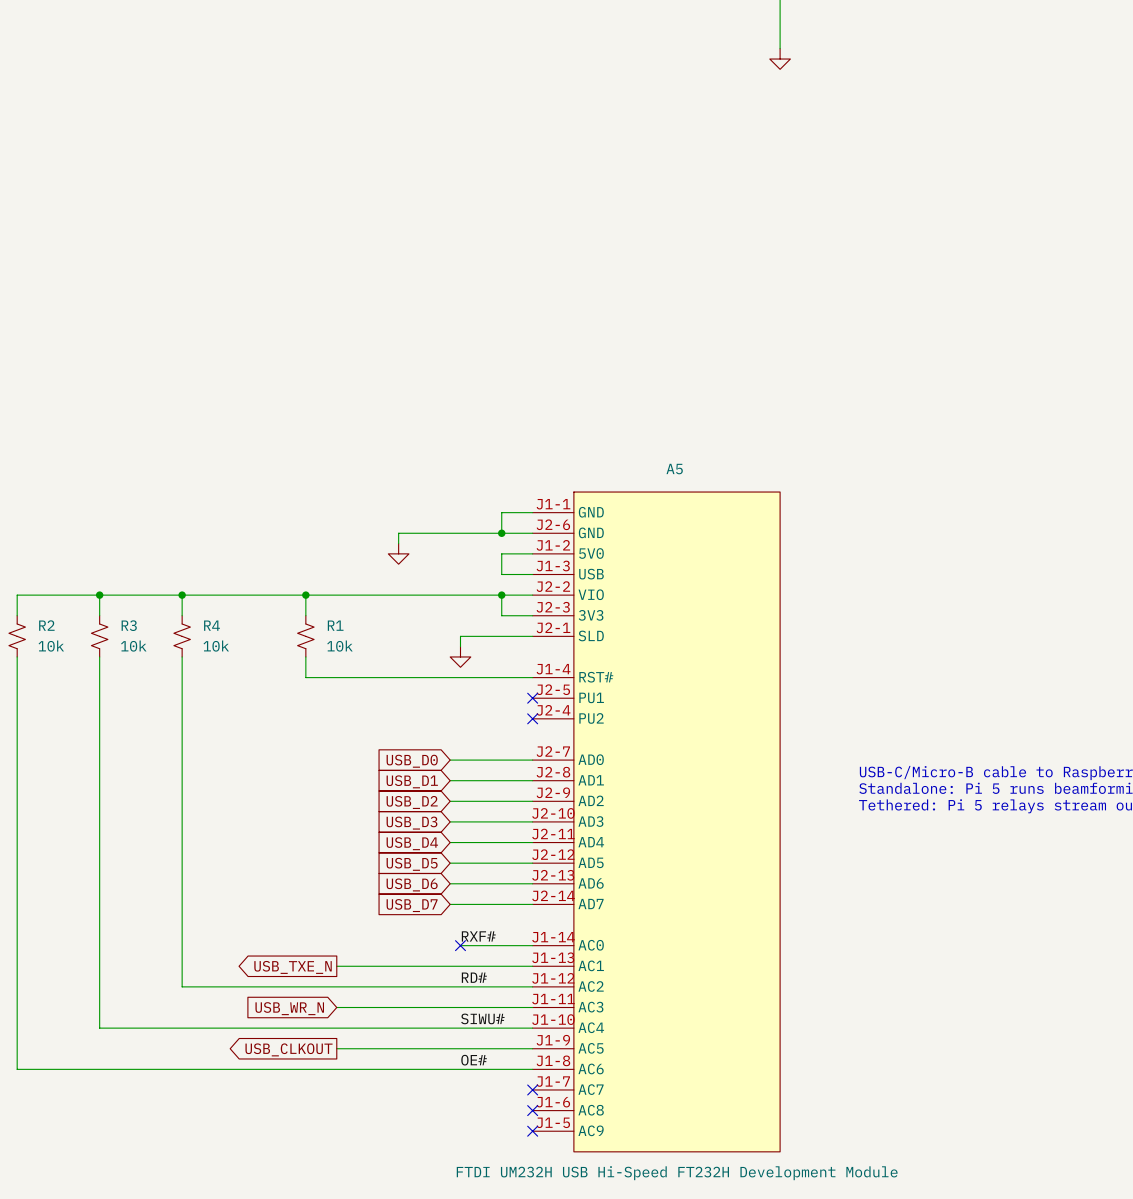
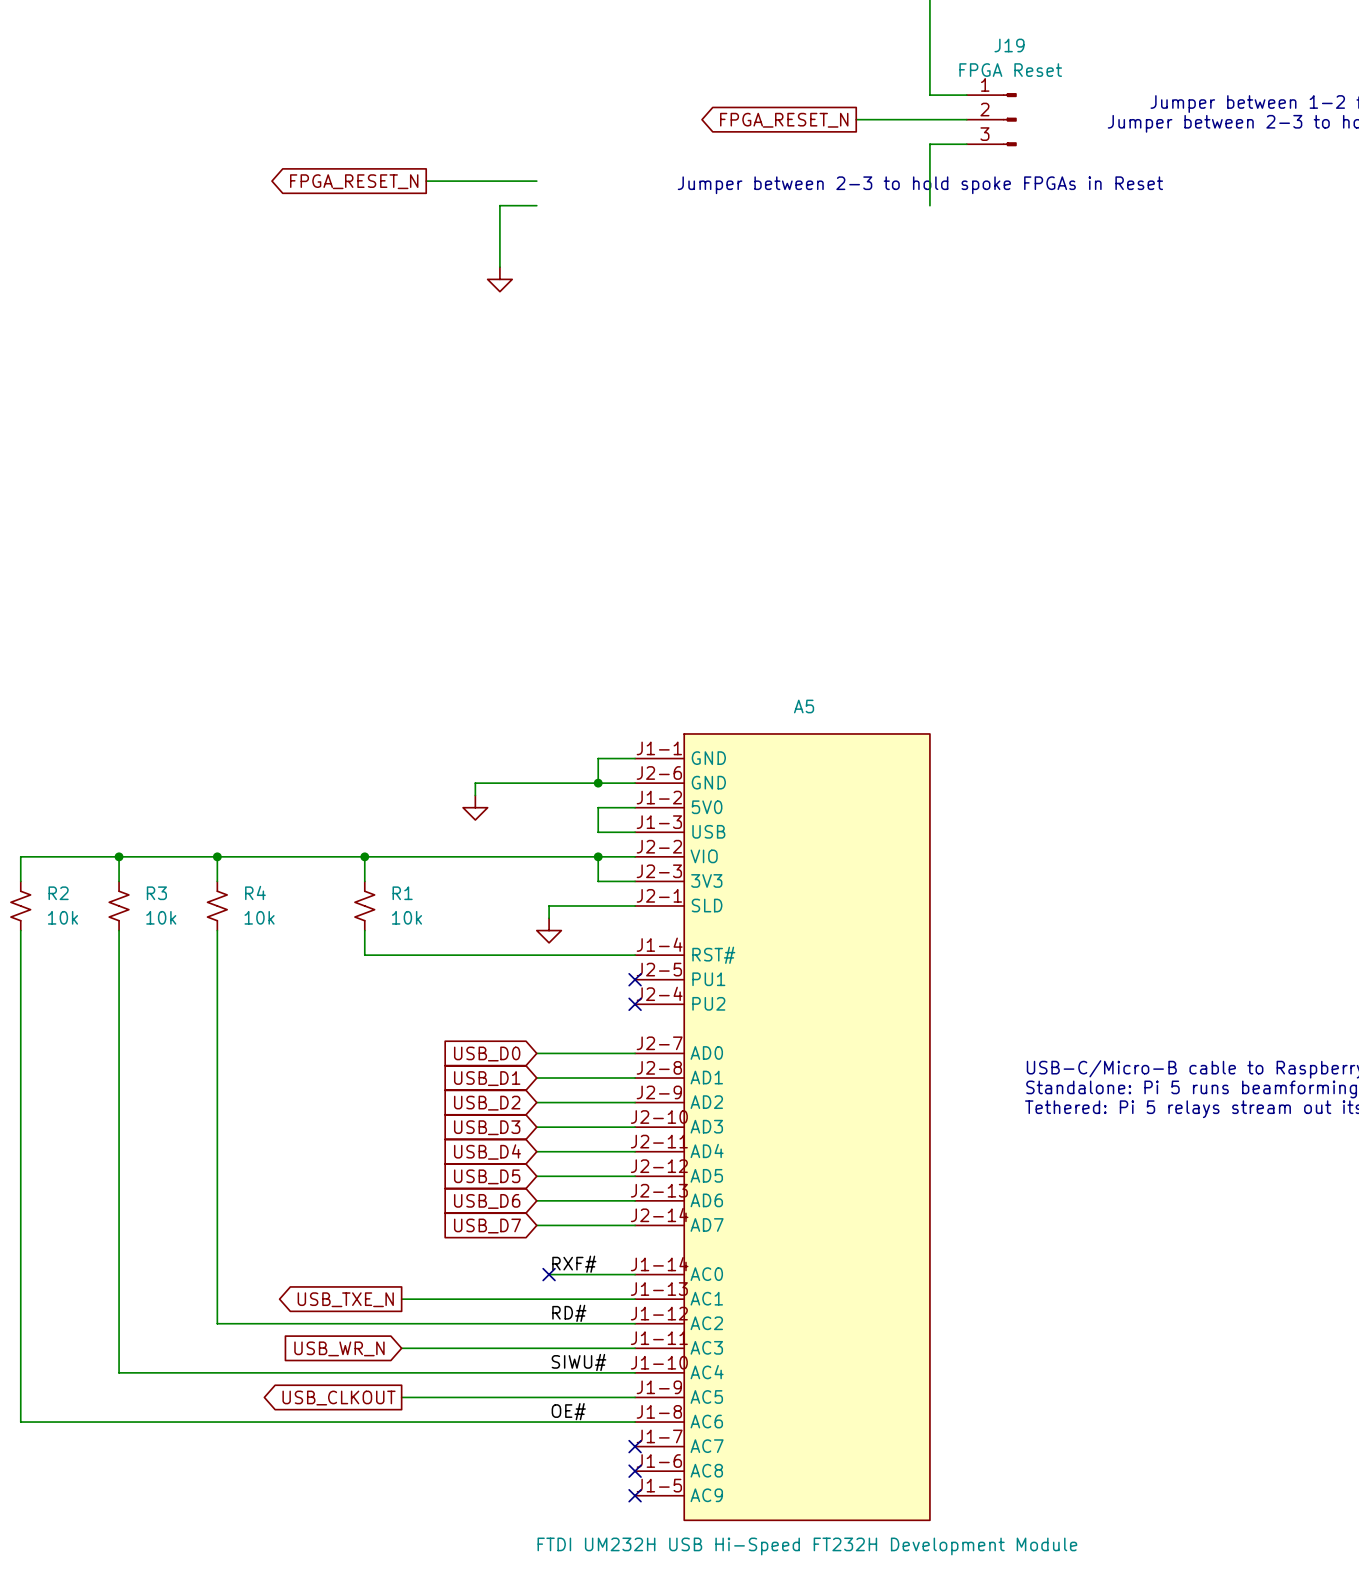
wire: none -> (426, 181) (536, 181)
global label: none -> FPGA_RESET_N (354, 181)
text: none -> Jumper between 2-3 to hold spoke FPGAs in Reset (920, 185)
wire: none -> (536, 205) (499, 205) (499, 267)
power symbol: (780, 59) -> none
power symbol: none -> (499, 279)

